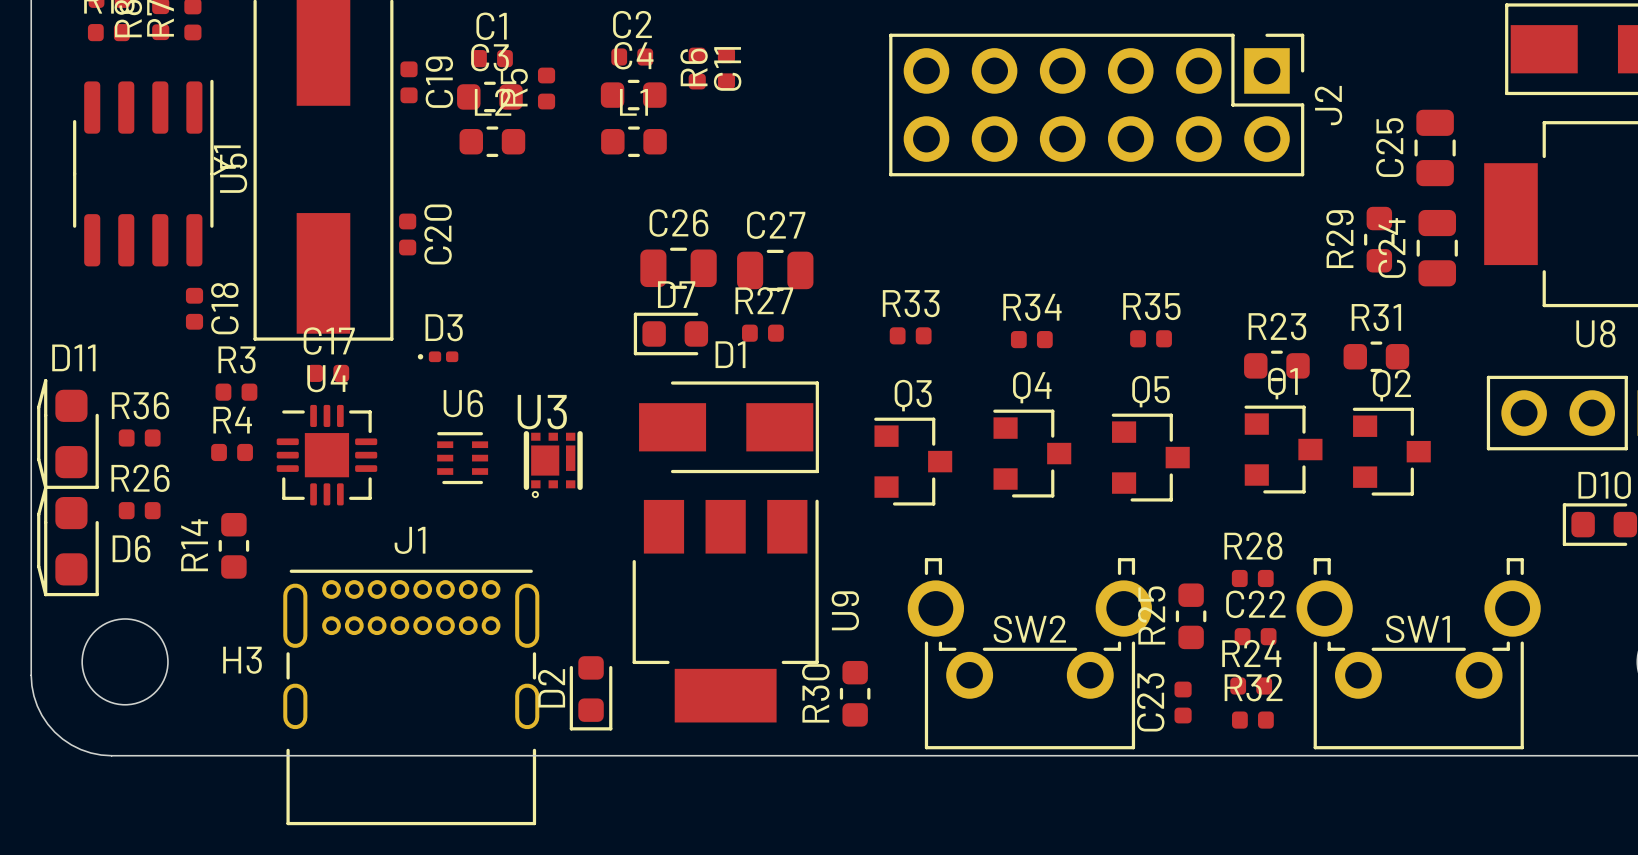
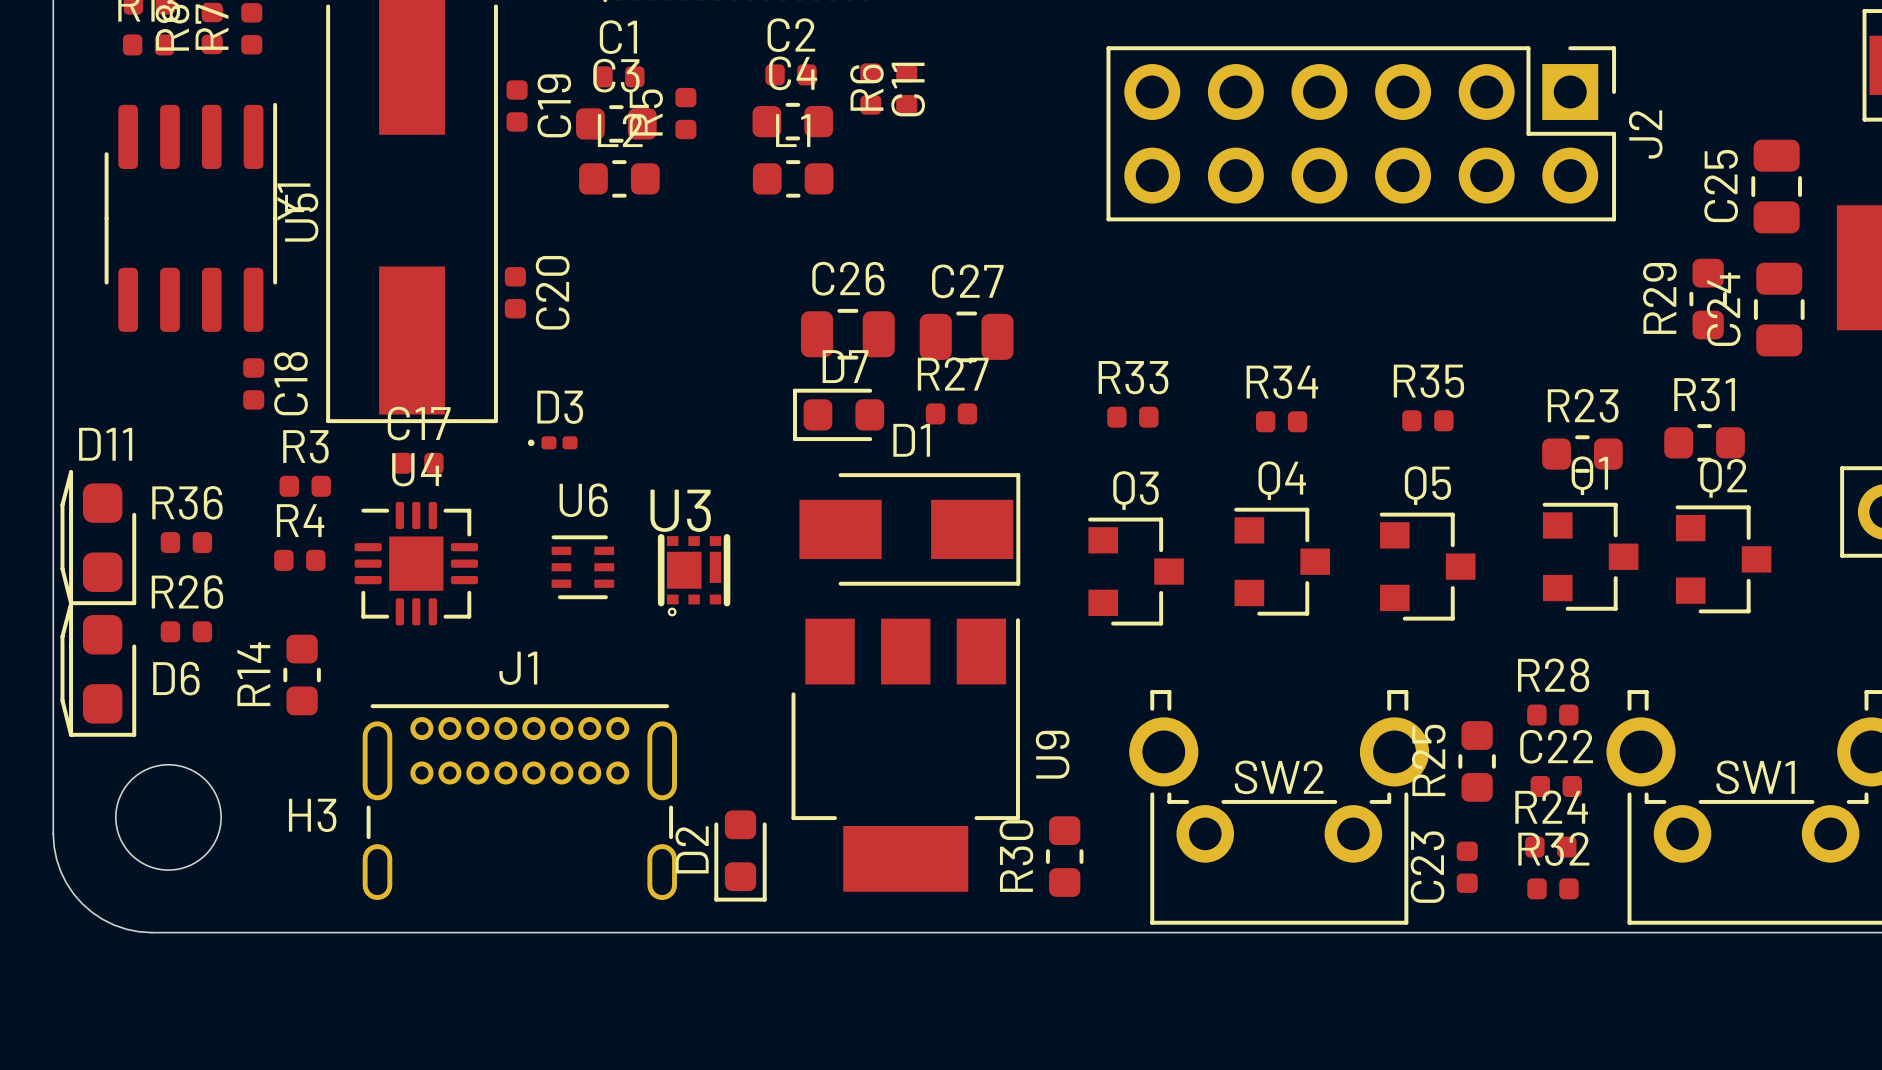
J1 footprint: [283, 569, 540, 826] -> [362, 704, 677, 901]

